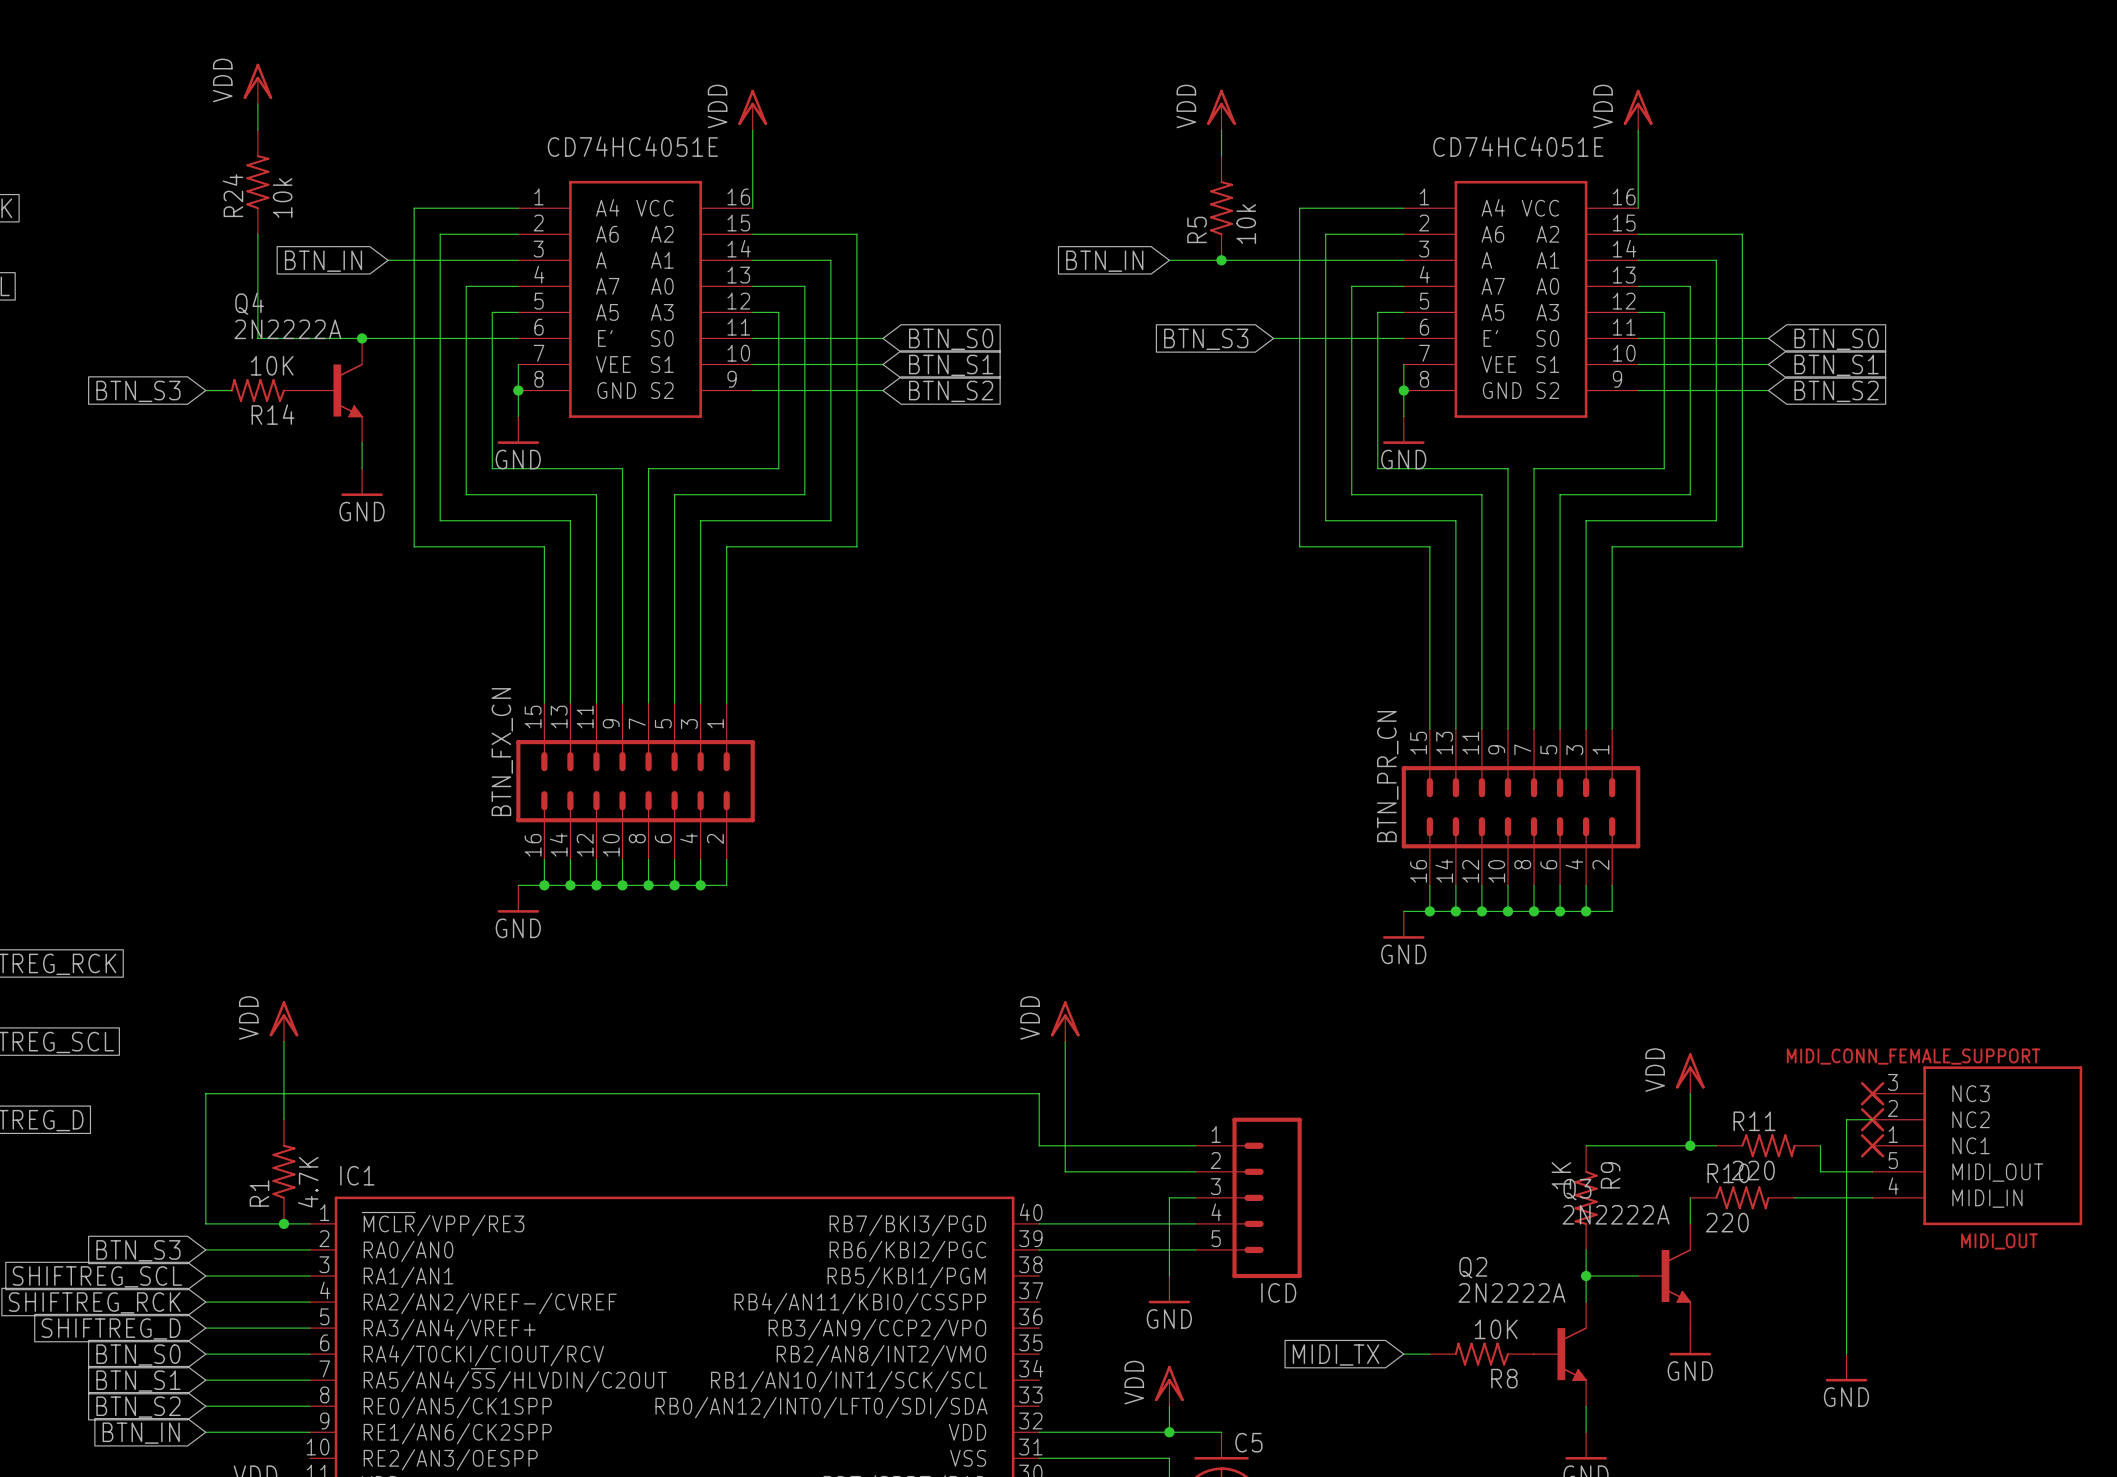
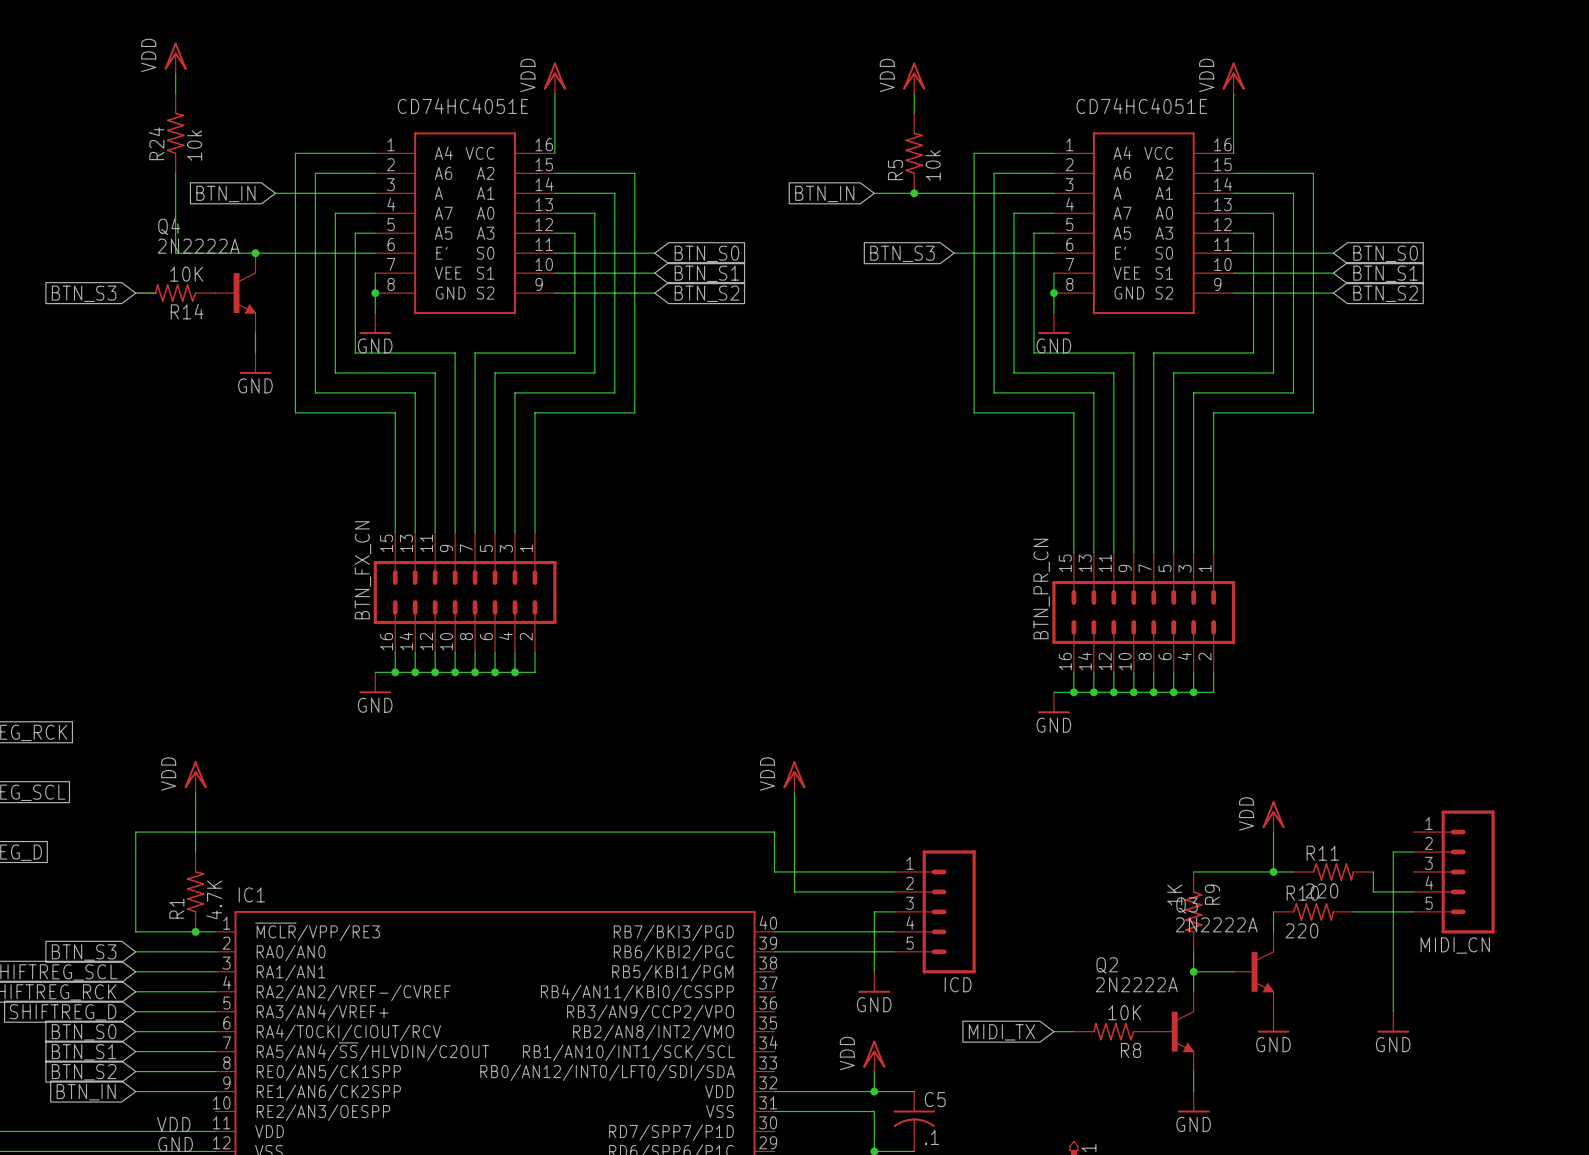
MIDI_CN: none -> (1453, 871)
MIDI_OUT: MIDI_CONN_FEMALE_SUPPORT (1971, 1145) -> none
power symbol position: GND (1846, 1367) -> GND (1393, 1022)

